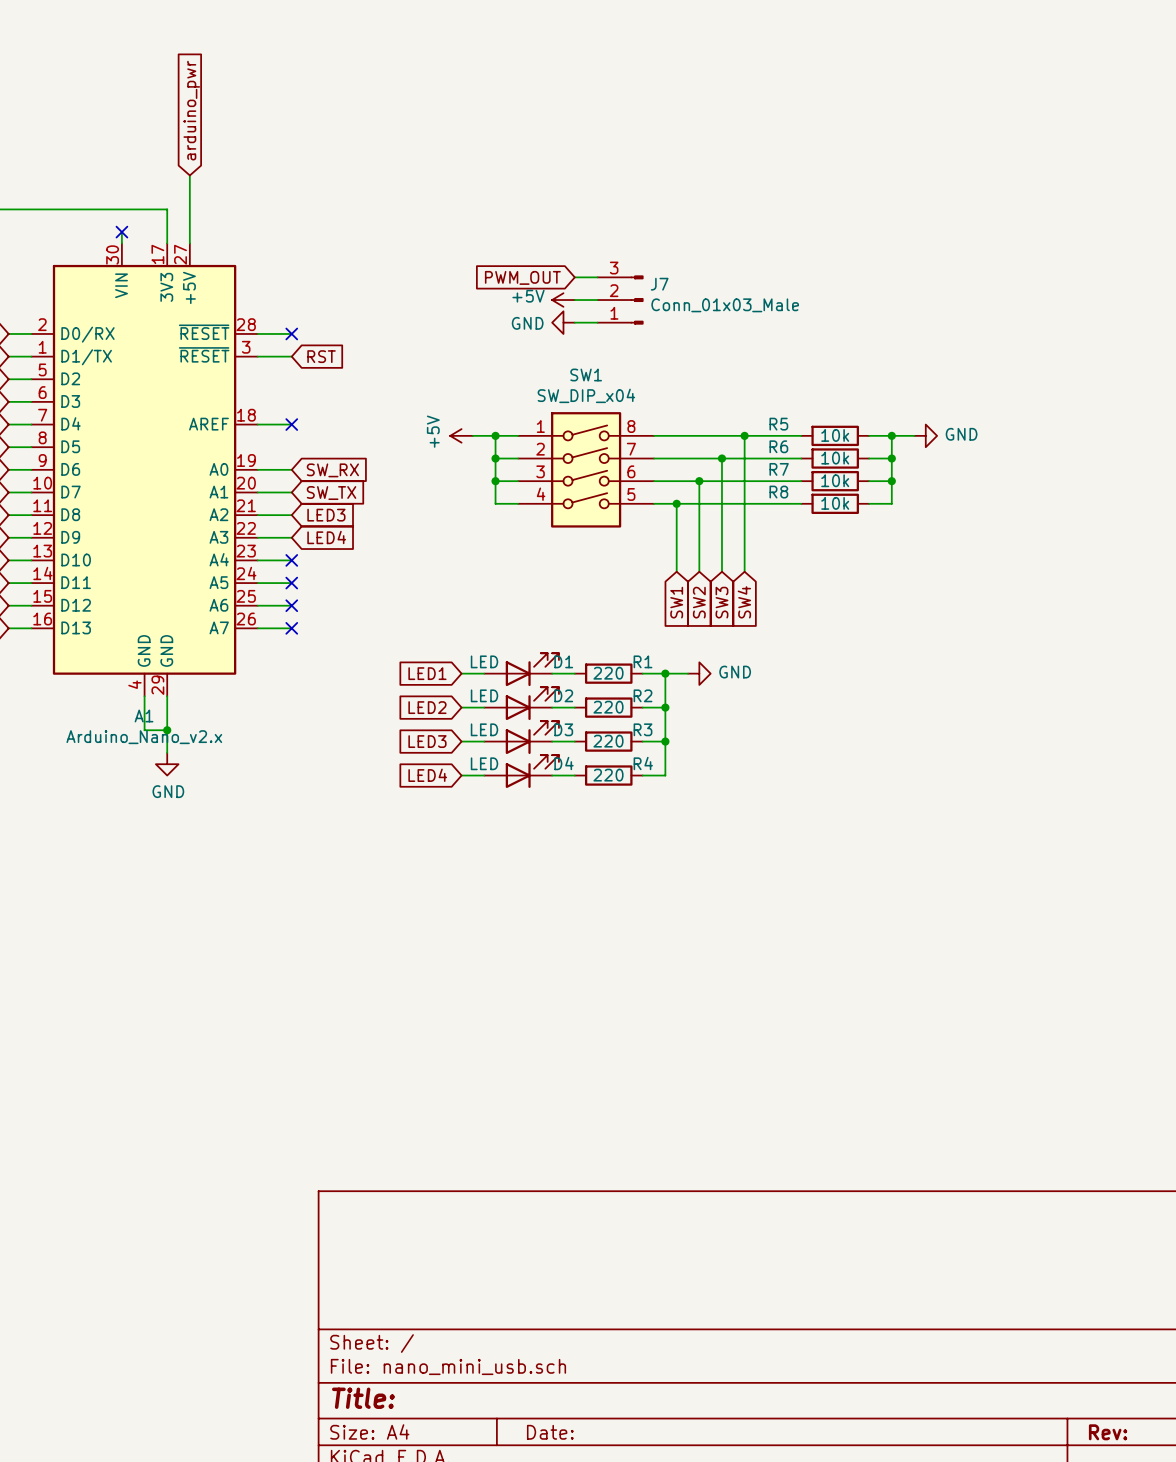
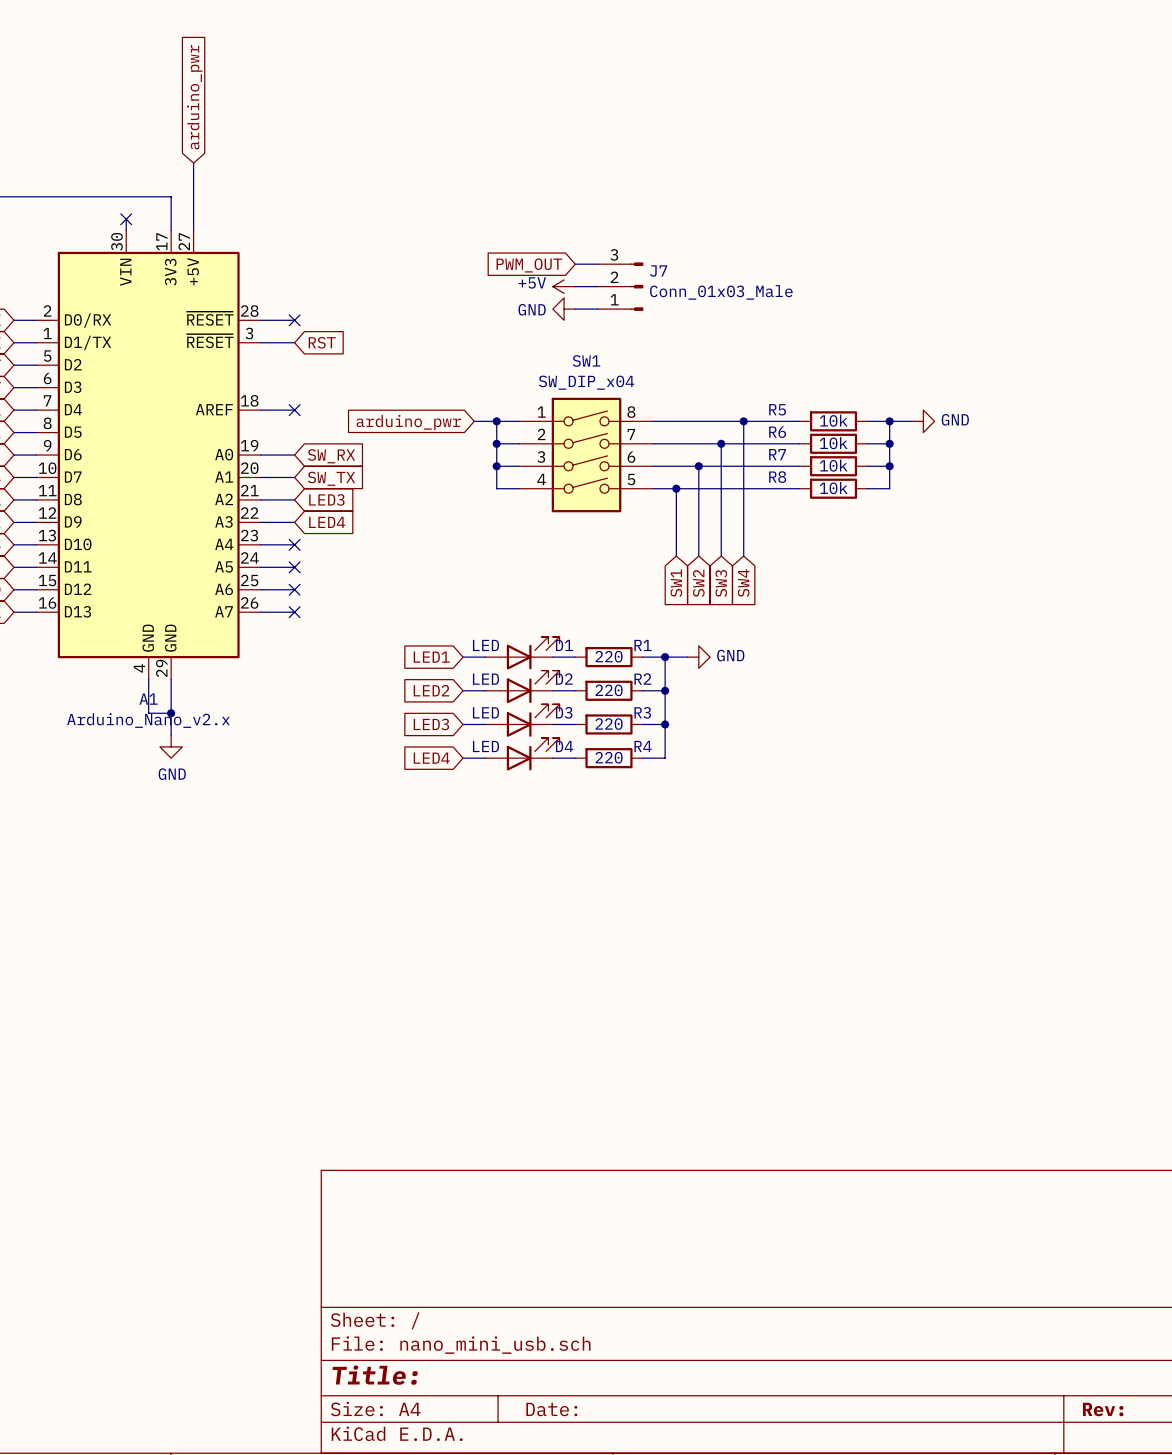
power symbol: +5V (461, 435) -> none
global label: none -> arduino_pwr (408, 422)

